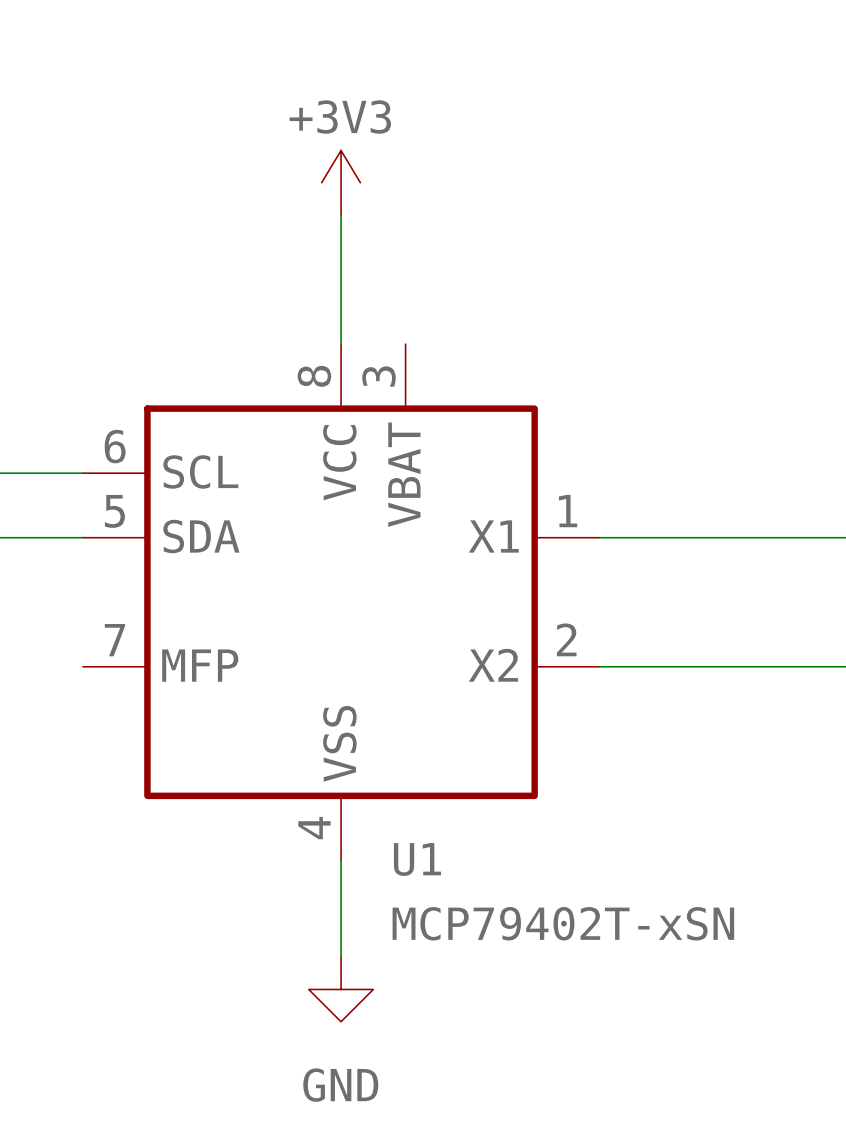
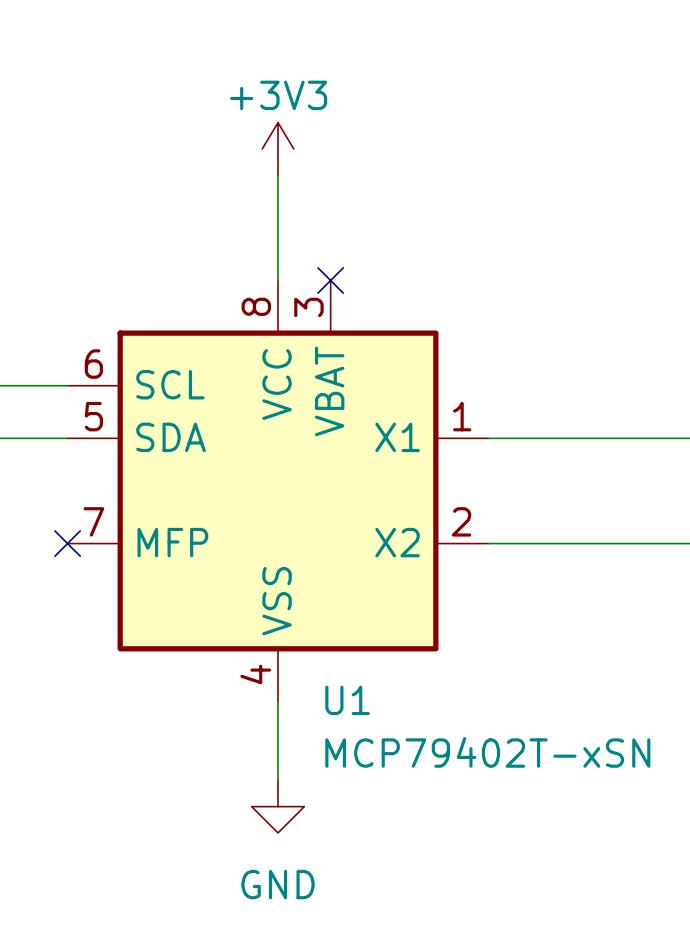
no-connect mark: none -> (330, 280)
no-connect mark: none -> (67, 543)

